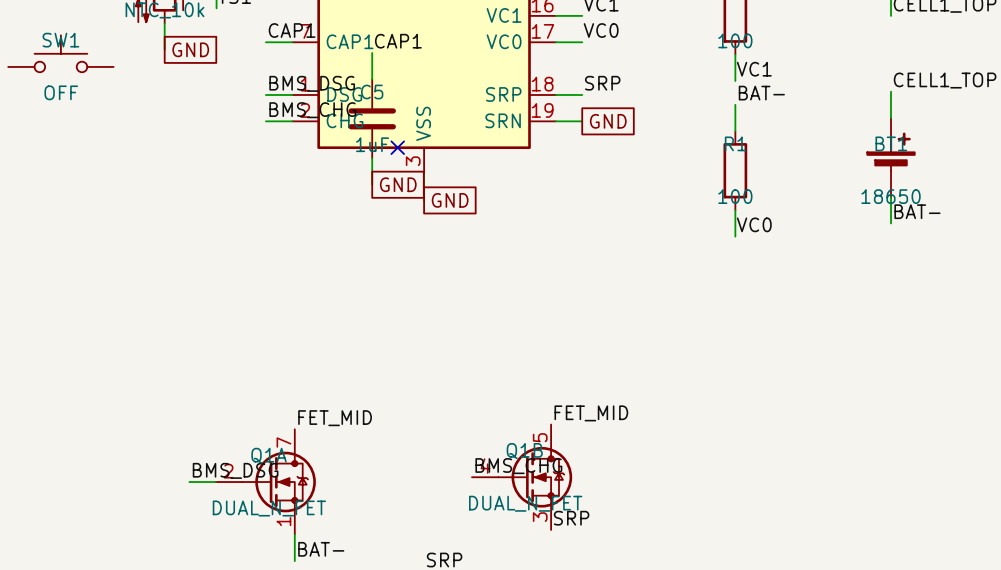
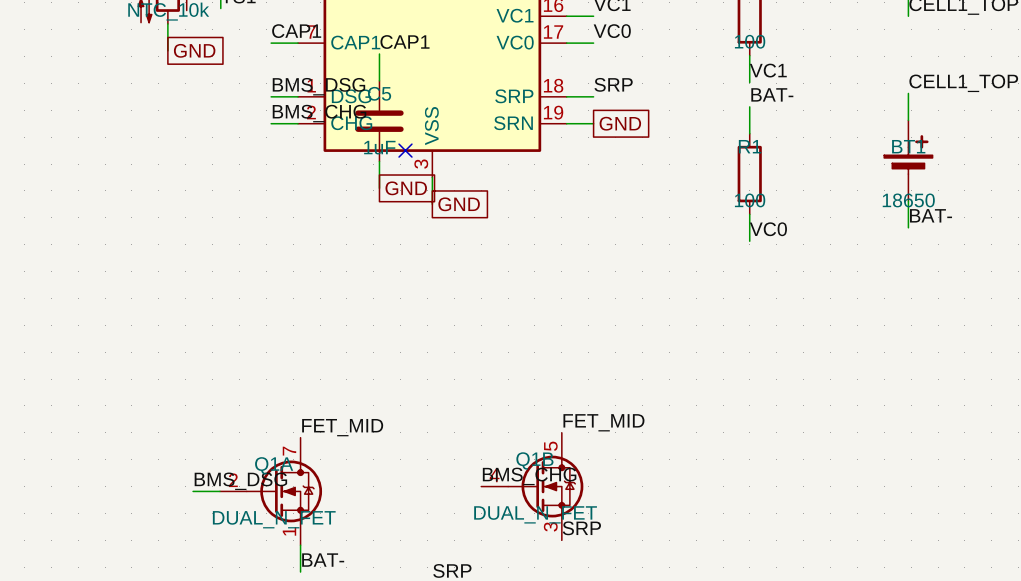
SW1: OFF (60, 53) -> none

